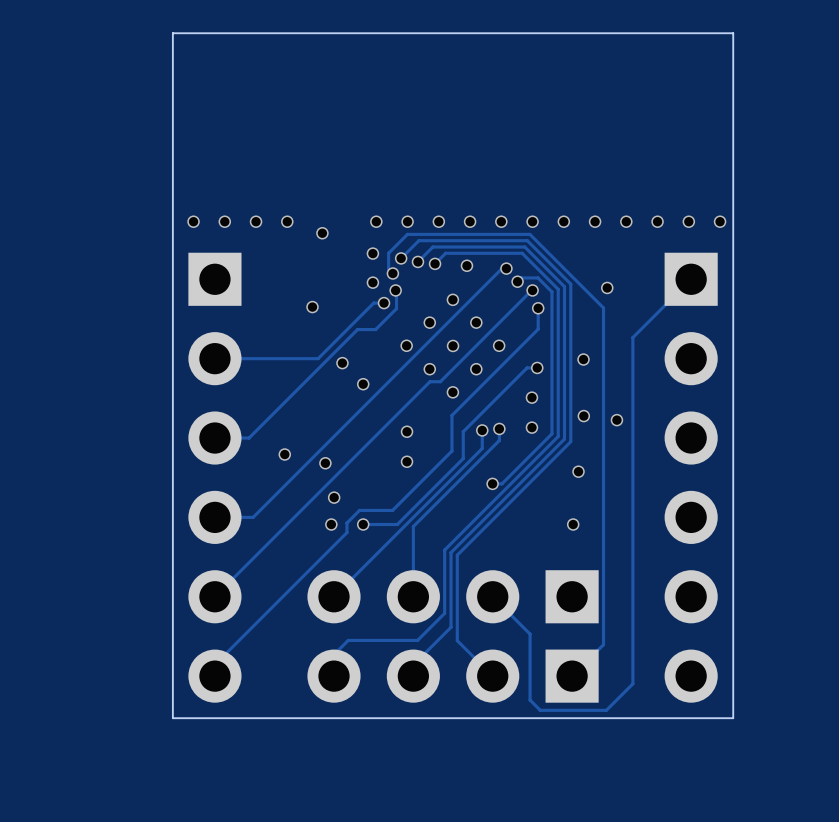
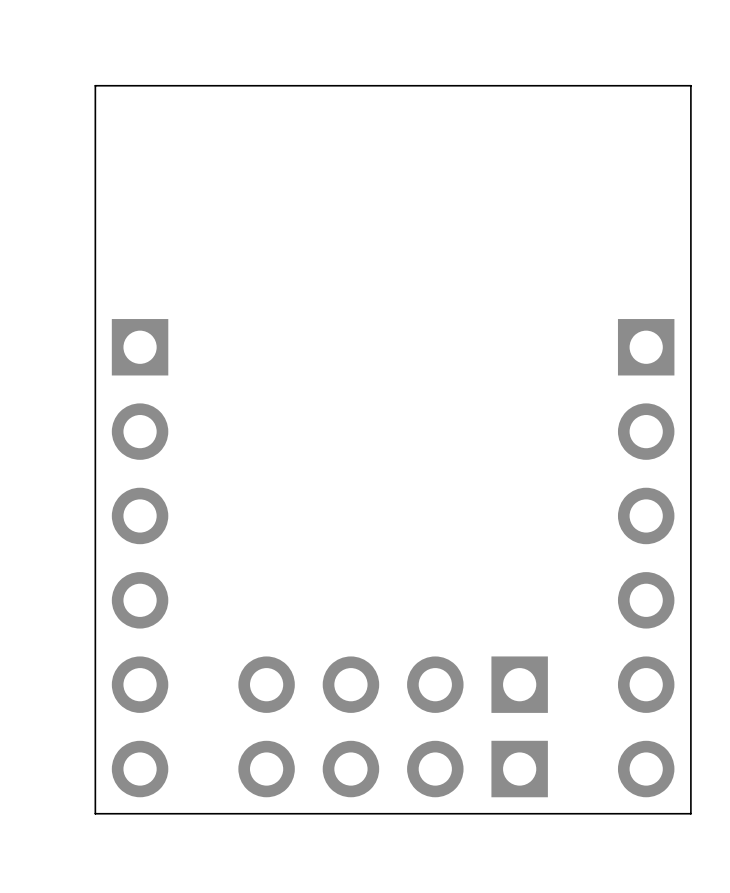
via: (193, 221) -> none
via: (224, 221) -> none
via: (256, 221) -> none
via: (287, 221) -> none
via: (376, 221) -> none
via: (407, 221) -> none
via: (438, 221) -> none
via: (470, 221) -> none
via: (501, 221) -> none
via: (532, 221) -> none
via: (563, 221) -> none
via: (595, 221) -> none
via: (626, 221) -> none
via: (657, 221) -> none
via: (688, 221) -> none
via: (720, 221) -> none
via: (322, 233) -> none
via: (372, 253) -> none
track: (401, 258) (418, 240) (527, 240) (570, 284) (570, 441) (457, 555) (457, 640) (492, 676) -> none
via: (401, 258) -> none
track: (417, 261) (432, 247) (524, 247) (564, 286) (564, 439) (451, 552) (451, 627) (413, 664) (413, 676) -> none
via: (417, 261) -> none
track: (435, 263) (445, 253) (522, 253) (558, 289) (558, 436) (444, 550) (444, 613) (417, 640) (348, 640) (334, 654) (334, 676) -> none
via: (435, 263) -> none
via: (466, 265) -> none
track: (506, 268) (501, 268) (253, 517) (214, 517) (214, 508) -> none
via: (506, 268) -> none
track: (392, 273) (388, 269) (388, 253) (407, 234) (529, 234) (603, 307) (603, 644) (572, 676) (586, 676) -> none
via: (392, 273) -> none
track: (691, 279) (632, 337) (632, 683) (606, 710) (540, 710) (530, 700) (530, 634) (492, 596) -> none
track: (517, 281) (521, 277) (537, 277) (551, 291) (551, 433) (501, 483) (492, 483) -> none
via: (517, 281) -> none
via: (372, 282) -> none
via: (607, 287) -> none
track: (395, 290) (396, 308) (375, 329) (357, 329) (249, 438) (214, 438) -> none
via: (395, 290) -> none
track: (532, 290) (440, 381) (429, 381) (214, 596) (214, 586) -> none
via: (532, 290) -> none
via: (452, 299) -> none
track: (384, 303) (373, 303) (318, 358) (214, 358) -> none
via: (384, 303) -> none
via: (312, 307) -> none
track: (538, 308) (538, 329) (451, 415) (451, 451) (392, 510) (359, 510) (346, 523) (346, 532) (214, 664) (214, 676) -> none
via: (538, 308) -> none
via: (429, 322) -> none
via: (476, 322) -> none
via: (406, 345) -> none
via: (453, 345) -> none
via: (499, 345) -> none
via: (583, 359) -> none
via: (342, 363) -> none
track: (537, 367) (527, 367) (463, 431) (463, 458) (397, 524) (363, 524) -> none
via: (537, 367) -> none
via: (429, 369) -> none
via: (476, 369) -> none
via: (363, 384) -> none
via: (452, 392) -> none
via: (531, 397) -> none
via: (583, 416) -> none
via: (616, 420) -> none
via: (531, 427) -> none
track: (499, 428) (499, 440) (413, 526) (413, 596) -> none
via: (499, 428) -> none
track: (482, 430) (482, 448) (334, 596) -> none
via: (482, 430) -> none
via: (407, 431) -> none
via: (284, 454) -> none
via: (407, 461) -> none
via: (325, 463) -> none
via: (578, 471) -> none
via: (492, 483) -> none
via: (334, 497) -> none
via: (331, 524) -> none
via: (363, 524) -> none
via: (573, 524) -> none

